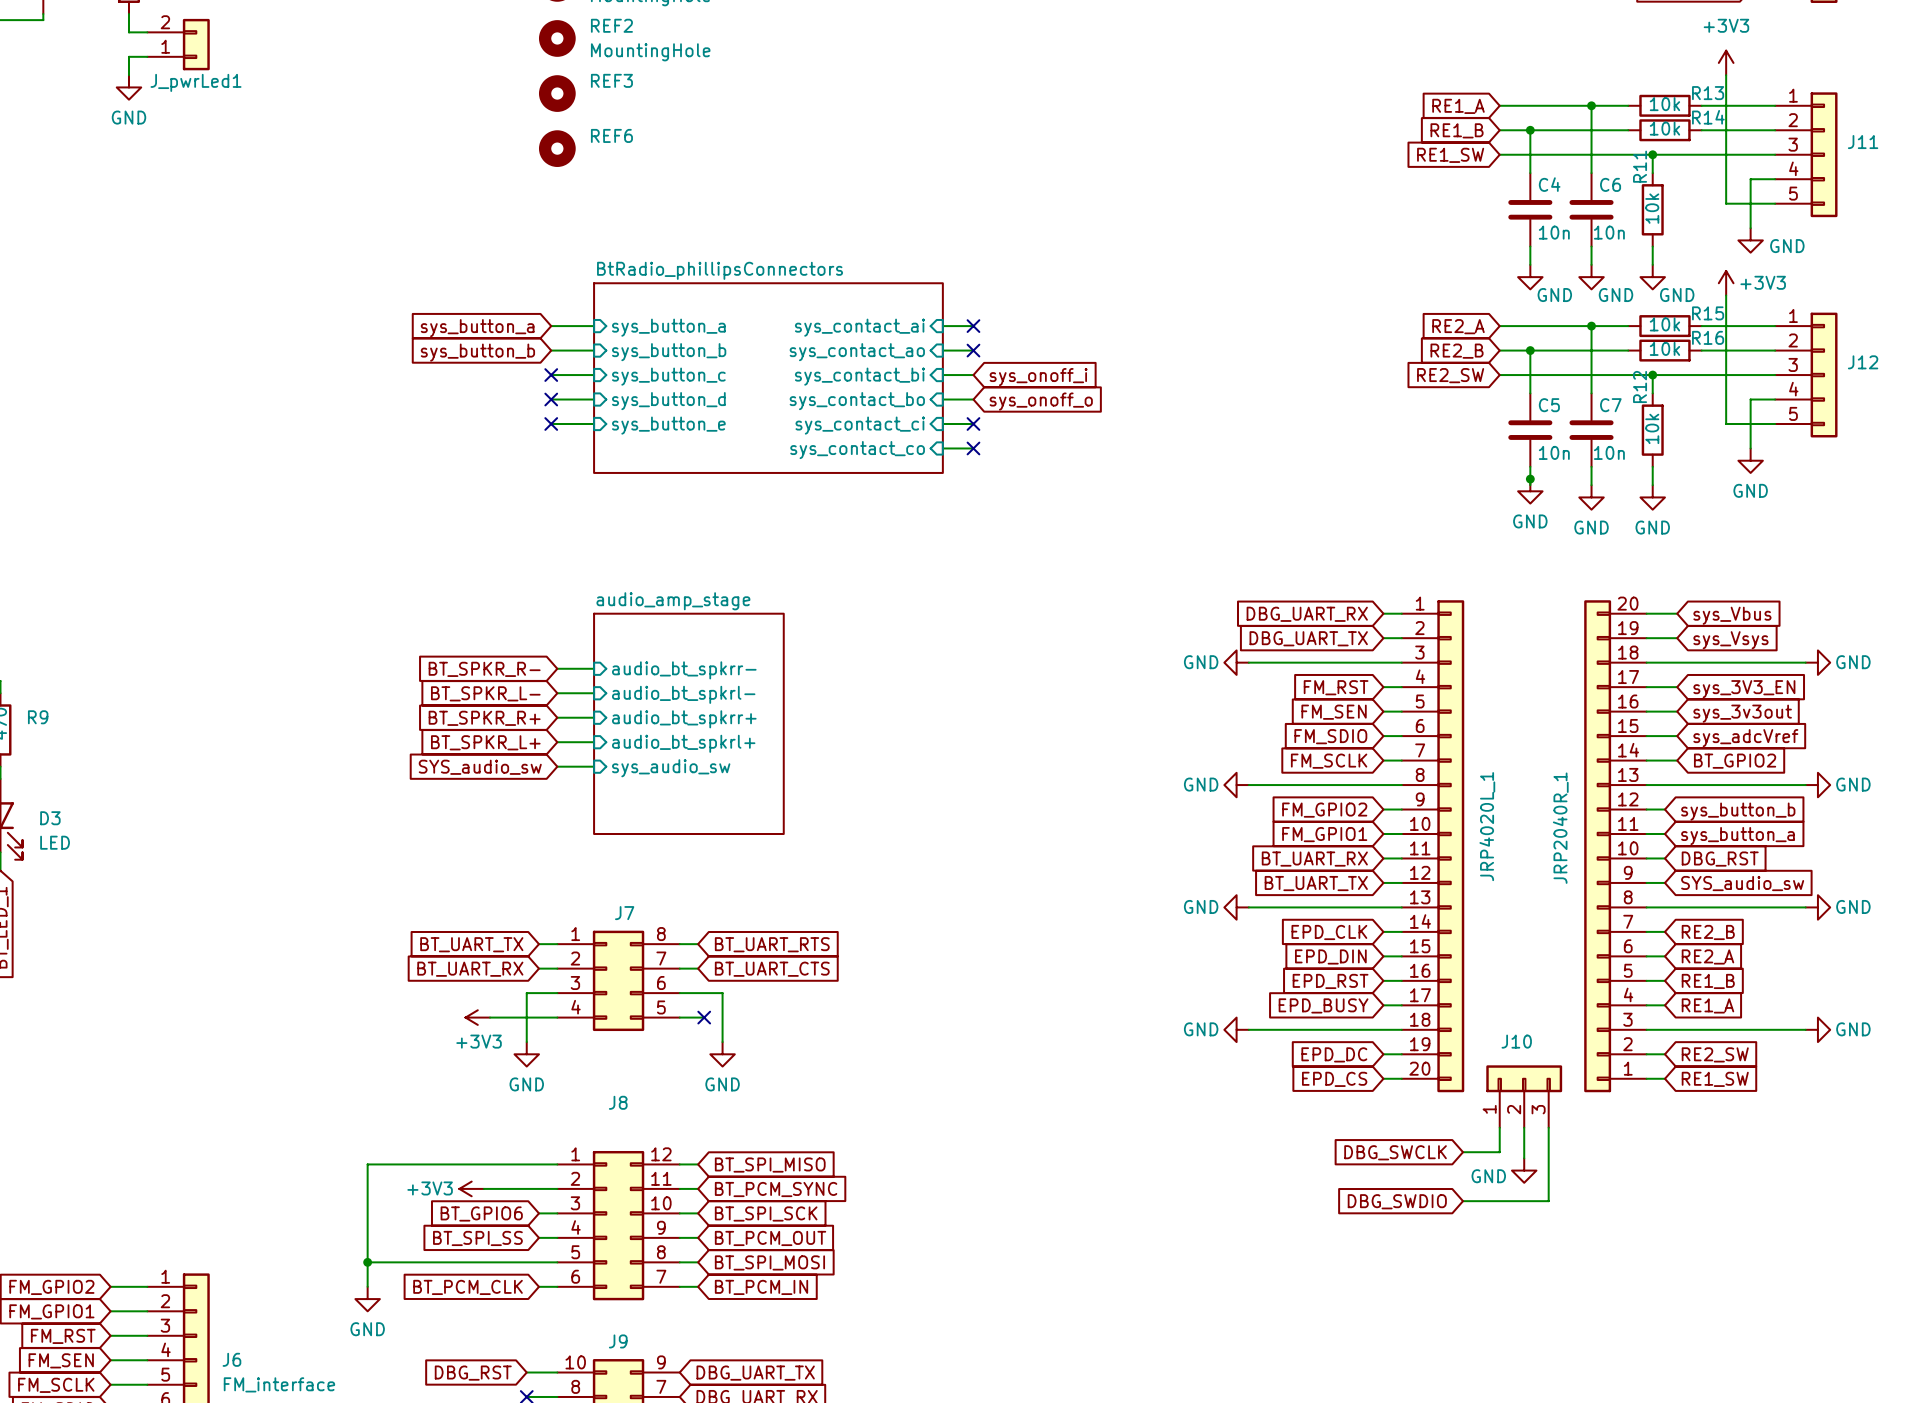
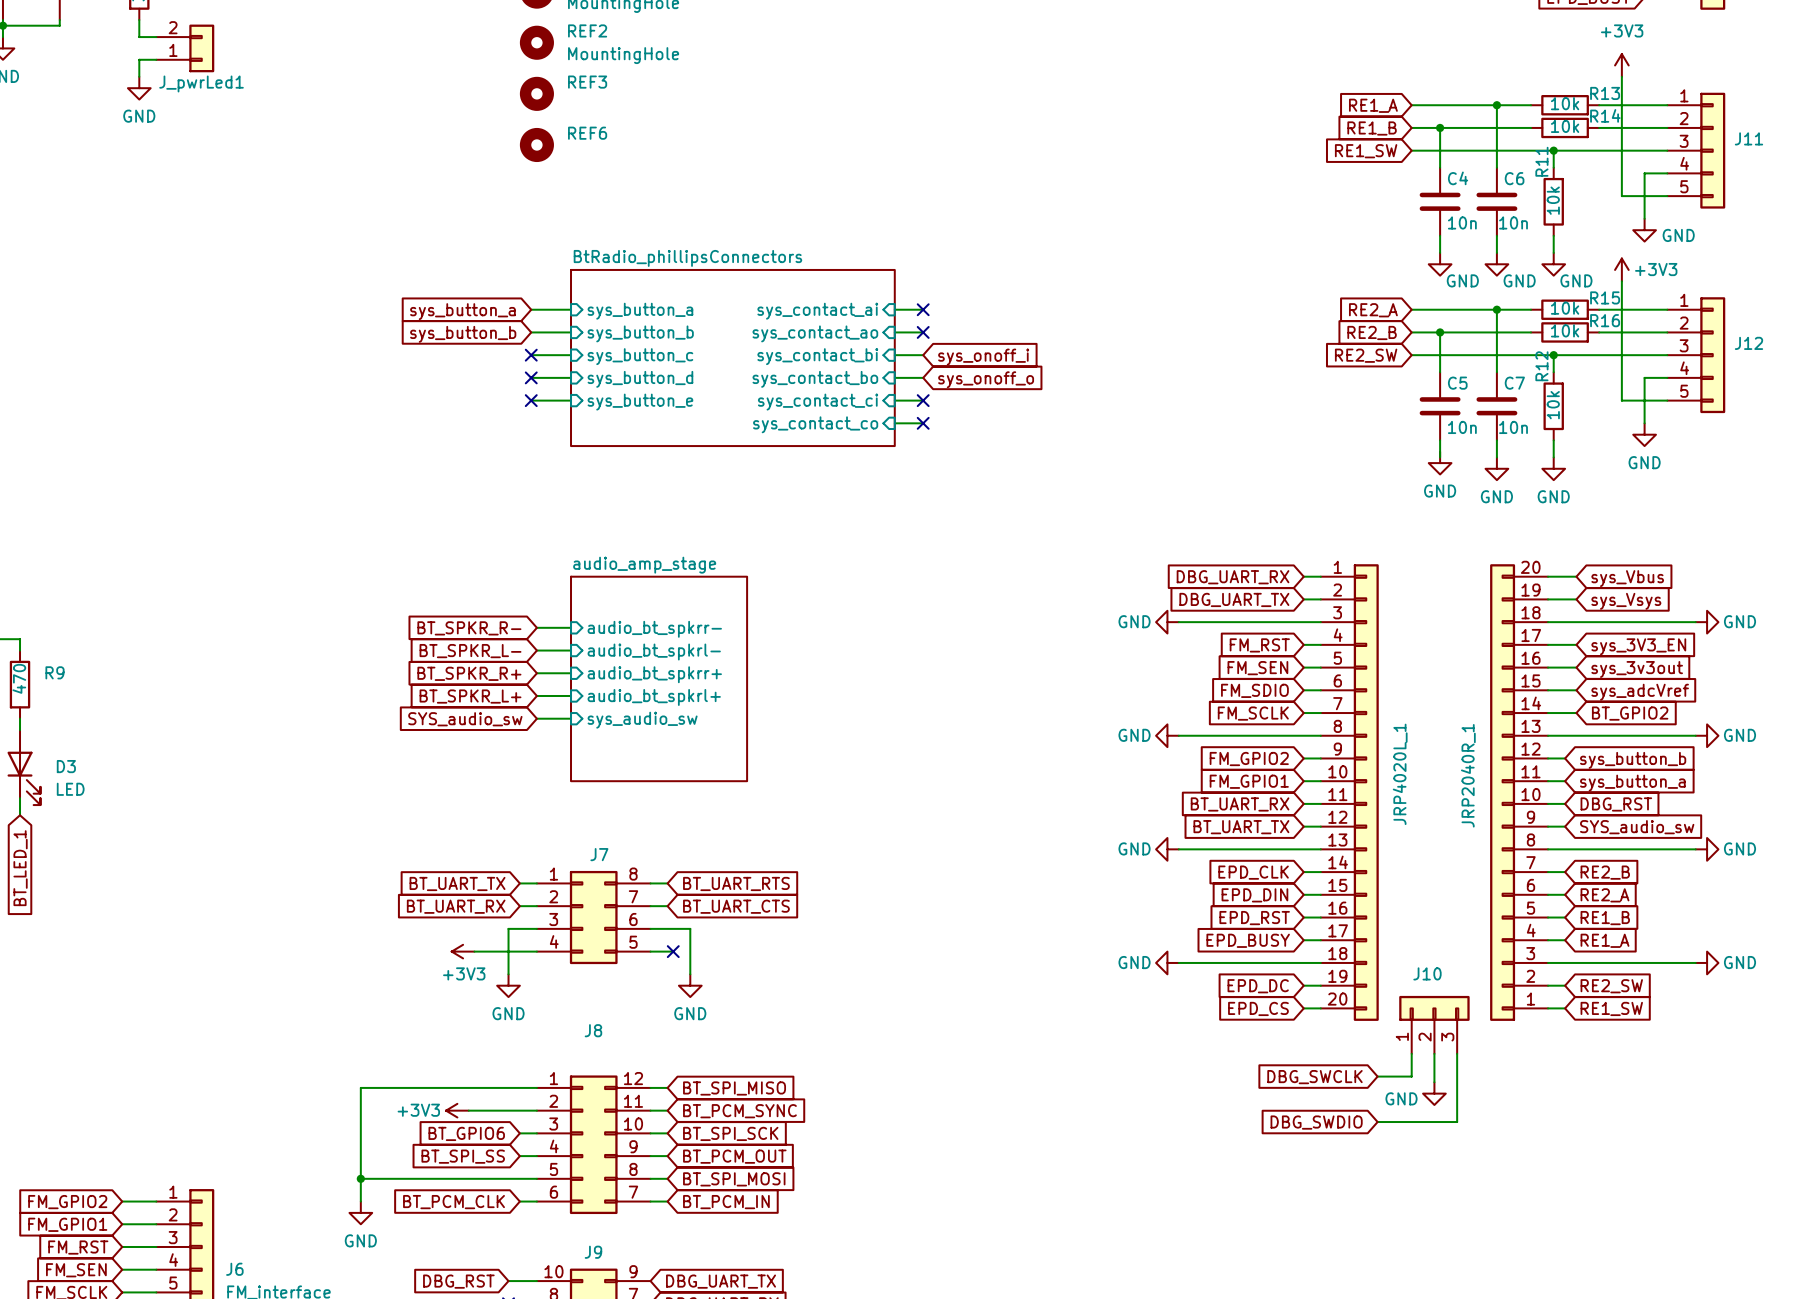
junction: (1530, 479) -> none

